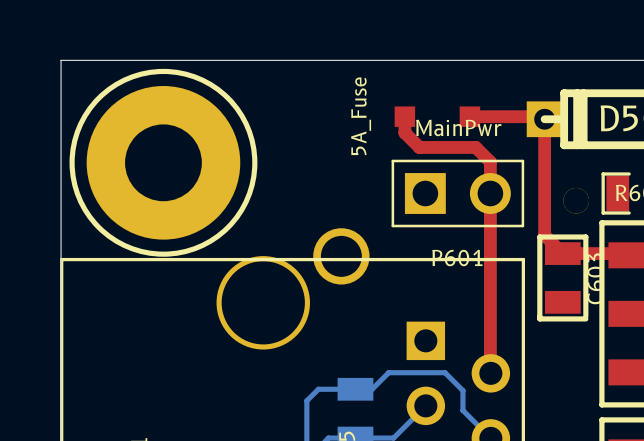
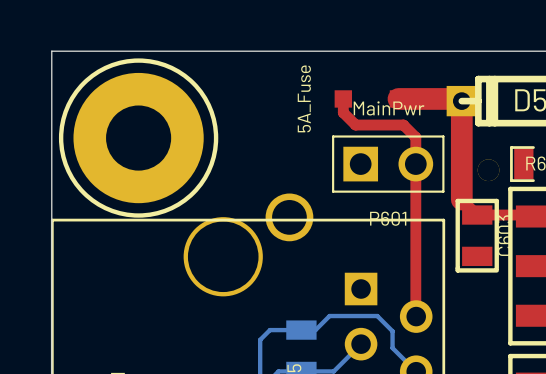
top track width: thin (469, 116) (542, 116) -> thick (398, 98) (459, 98)
top track width: thin (544, 119) (544, 235) -> thick (461, 101) (461, 199)

